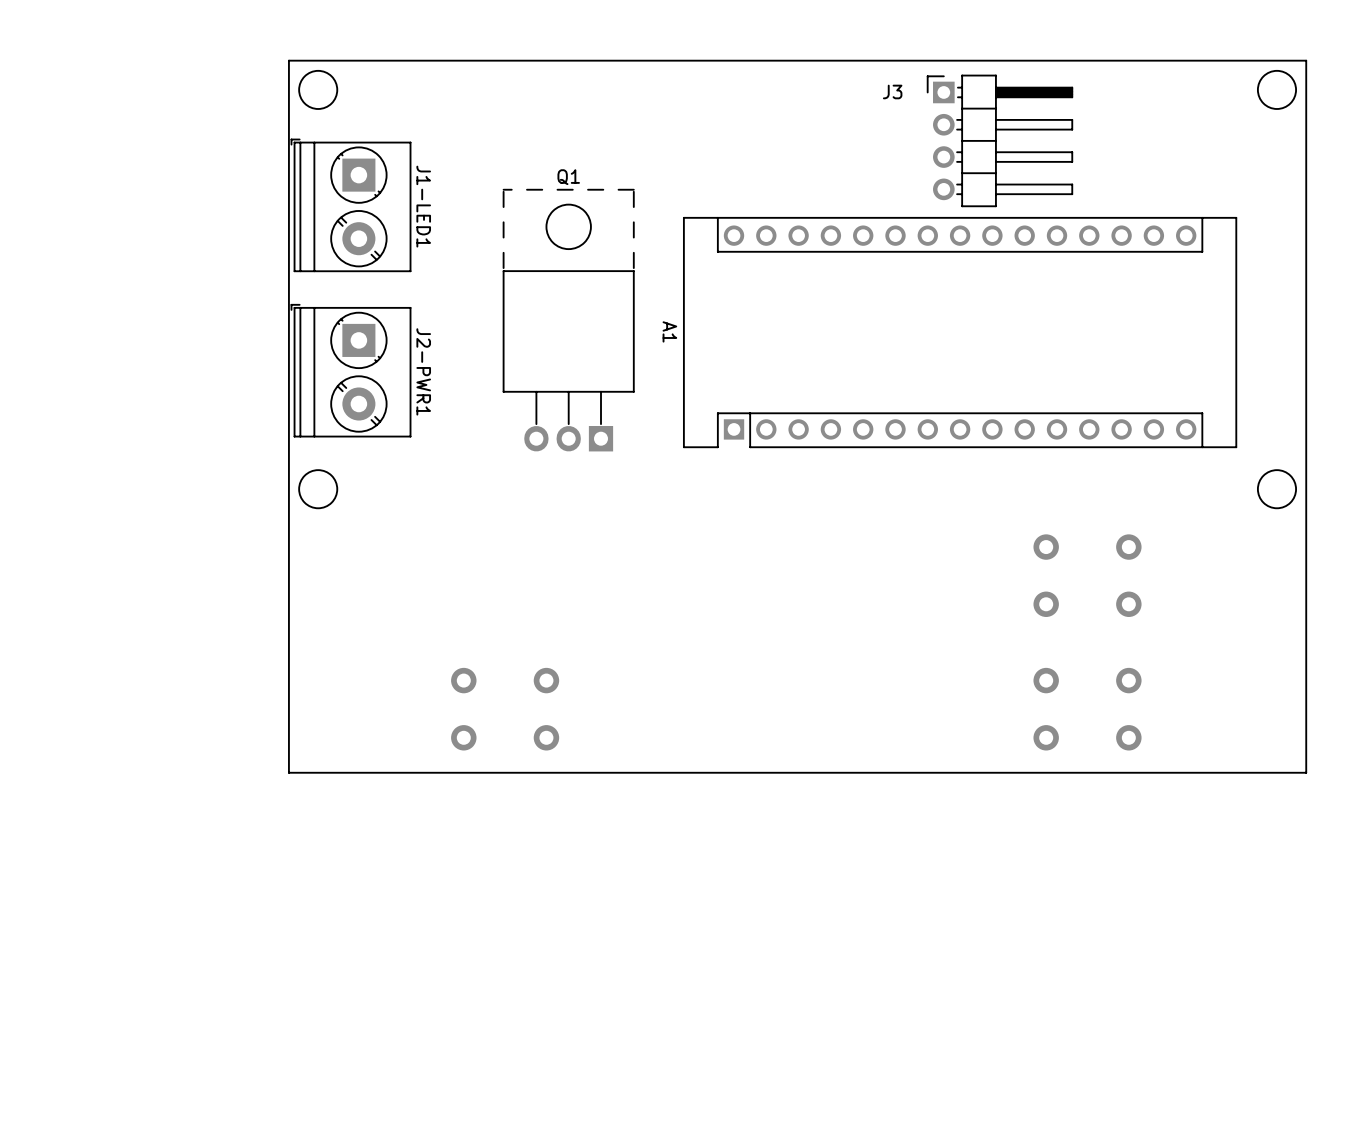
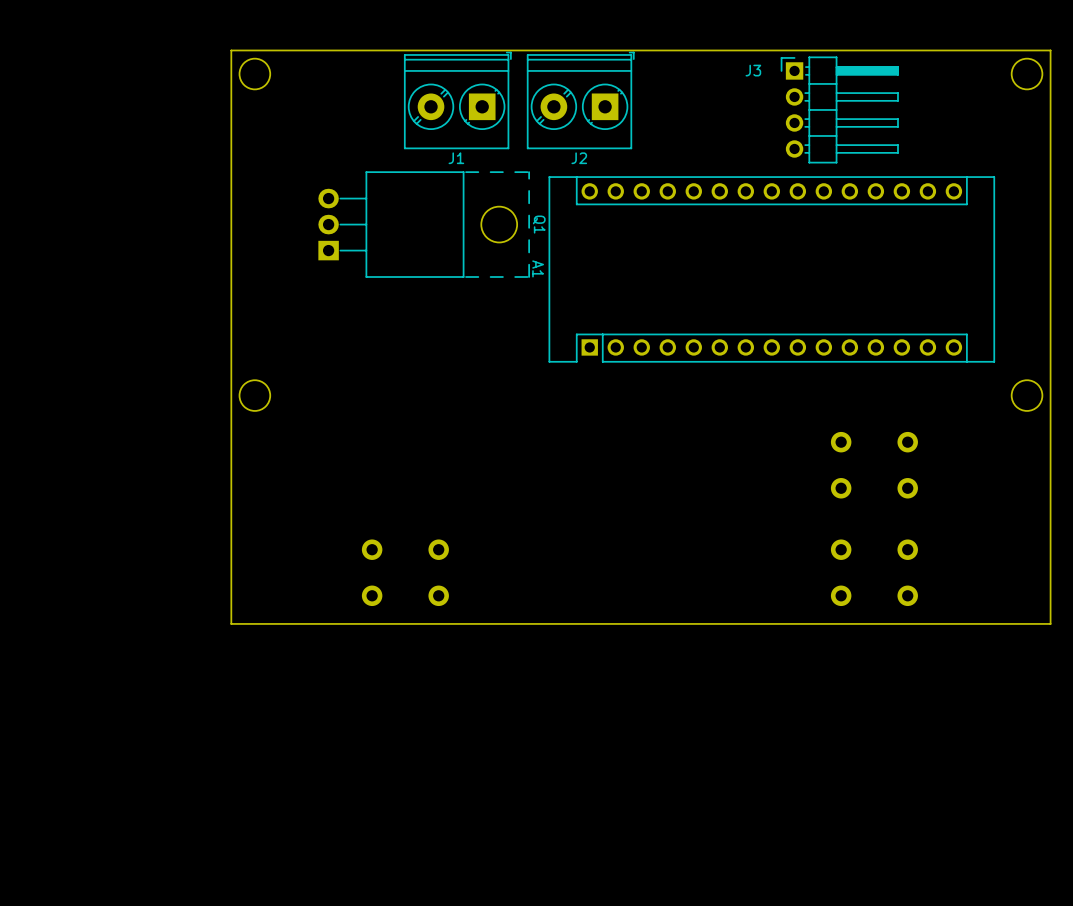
J1: none -> (457, 100)
J2: none -> (580, 100)
J3 position: (999, 140) -> (839, 109)
J1-LED1: (351, 205) -> none
Q1 rotation: 0° (568, 320) -> 90° clockwise (424, 224)
J2-PWR1: (351, 370) -> none

